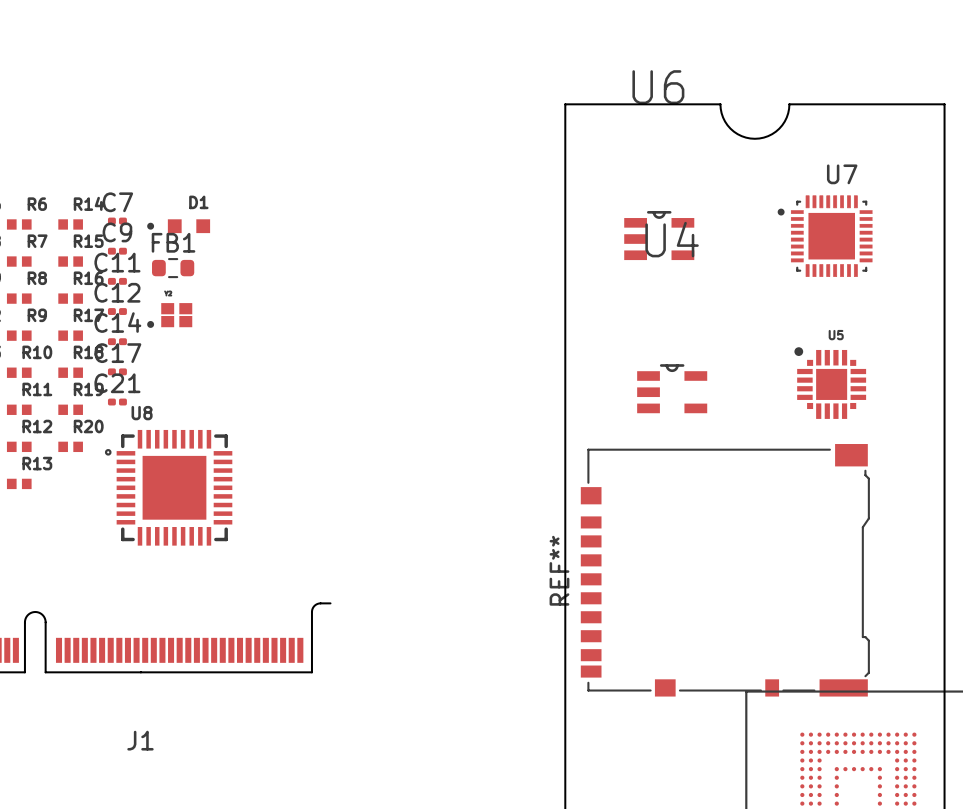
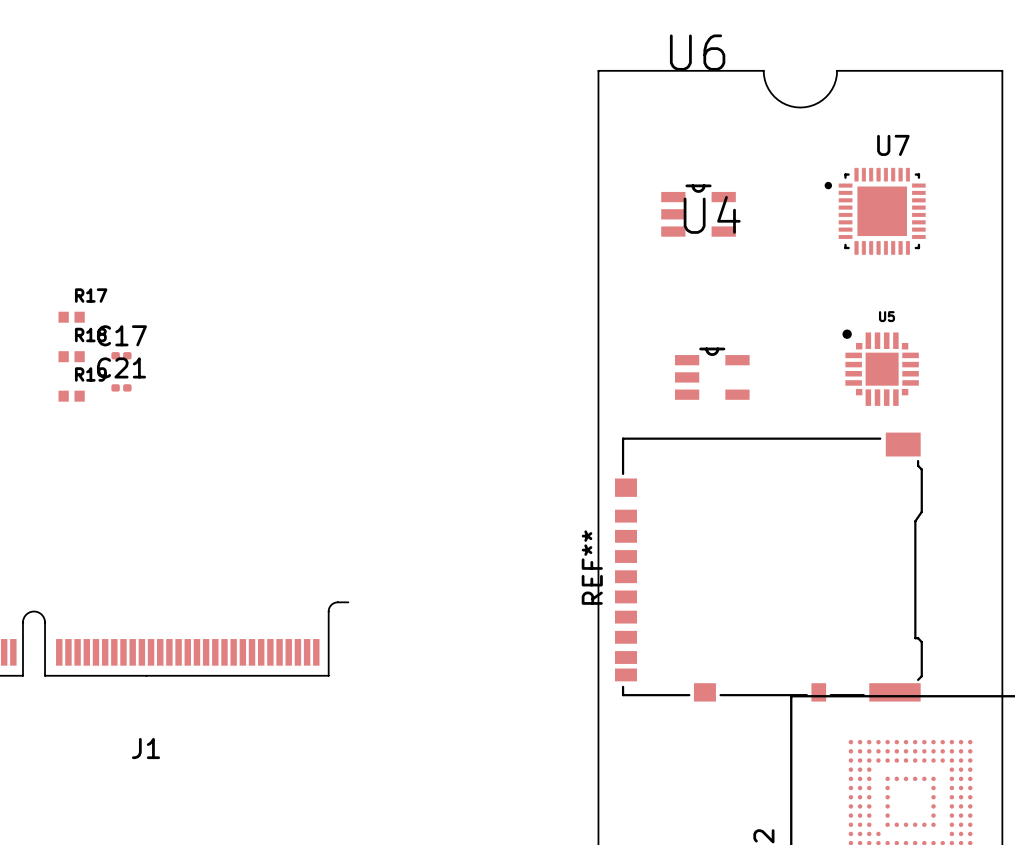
C7: (117, 221) -> none
R6: (19, 224) -> none
R14: (70, 224) -> none
D1: (178, 226) -> none
C9: (117, 251) -> none
R7: (19, 261) -> none
R15: (70, 261) -> none
FB1: (173, 268) -> none
C11: (117, 281) -> none
R8: (19, 298) -> none
R16: (70, 298) -> none
C12: (117, 311) -> none
part: (169, 315) -> none
R9: (19, 335) -> none
C14: (117, 341) -> none
R10: (19, 372) -> none
R11: (19, 409) -> none
R12: (19, 446) -> none
R20: (70, 446) -> none
R13: (19, 483) -> none
U8: (168, 487) -> none

